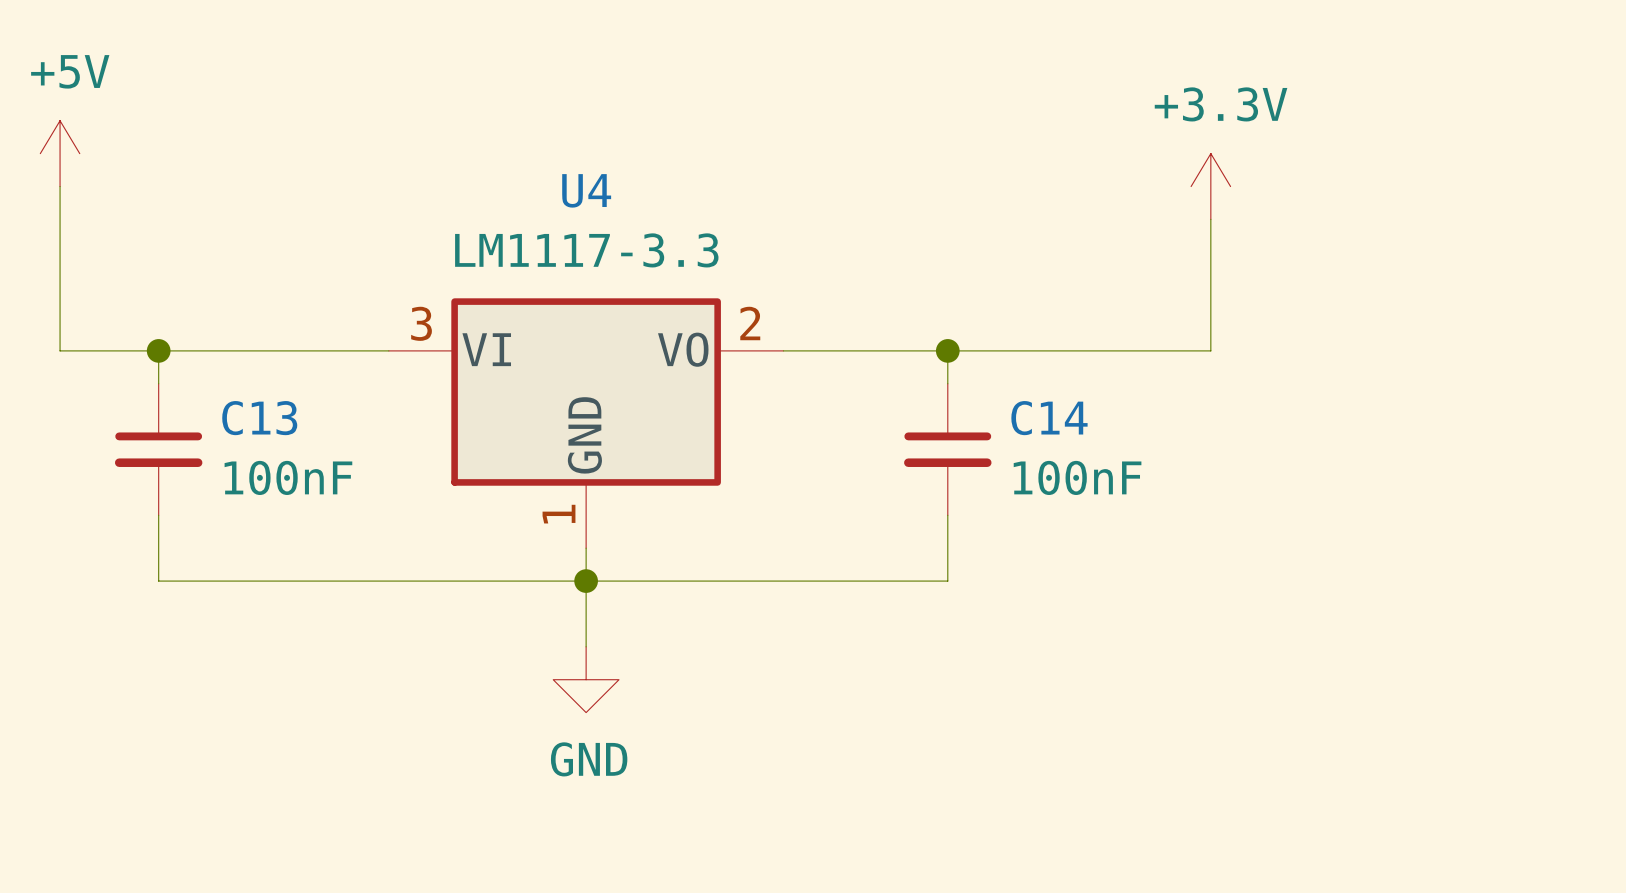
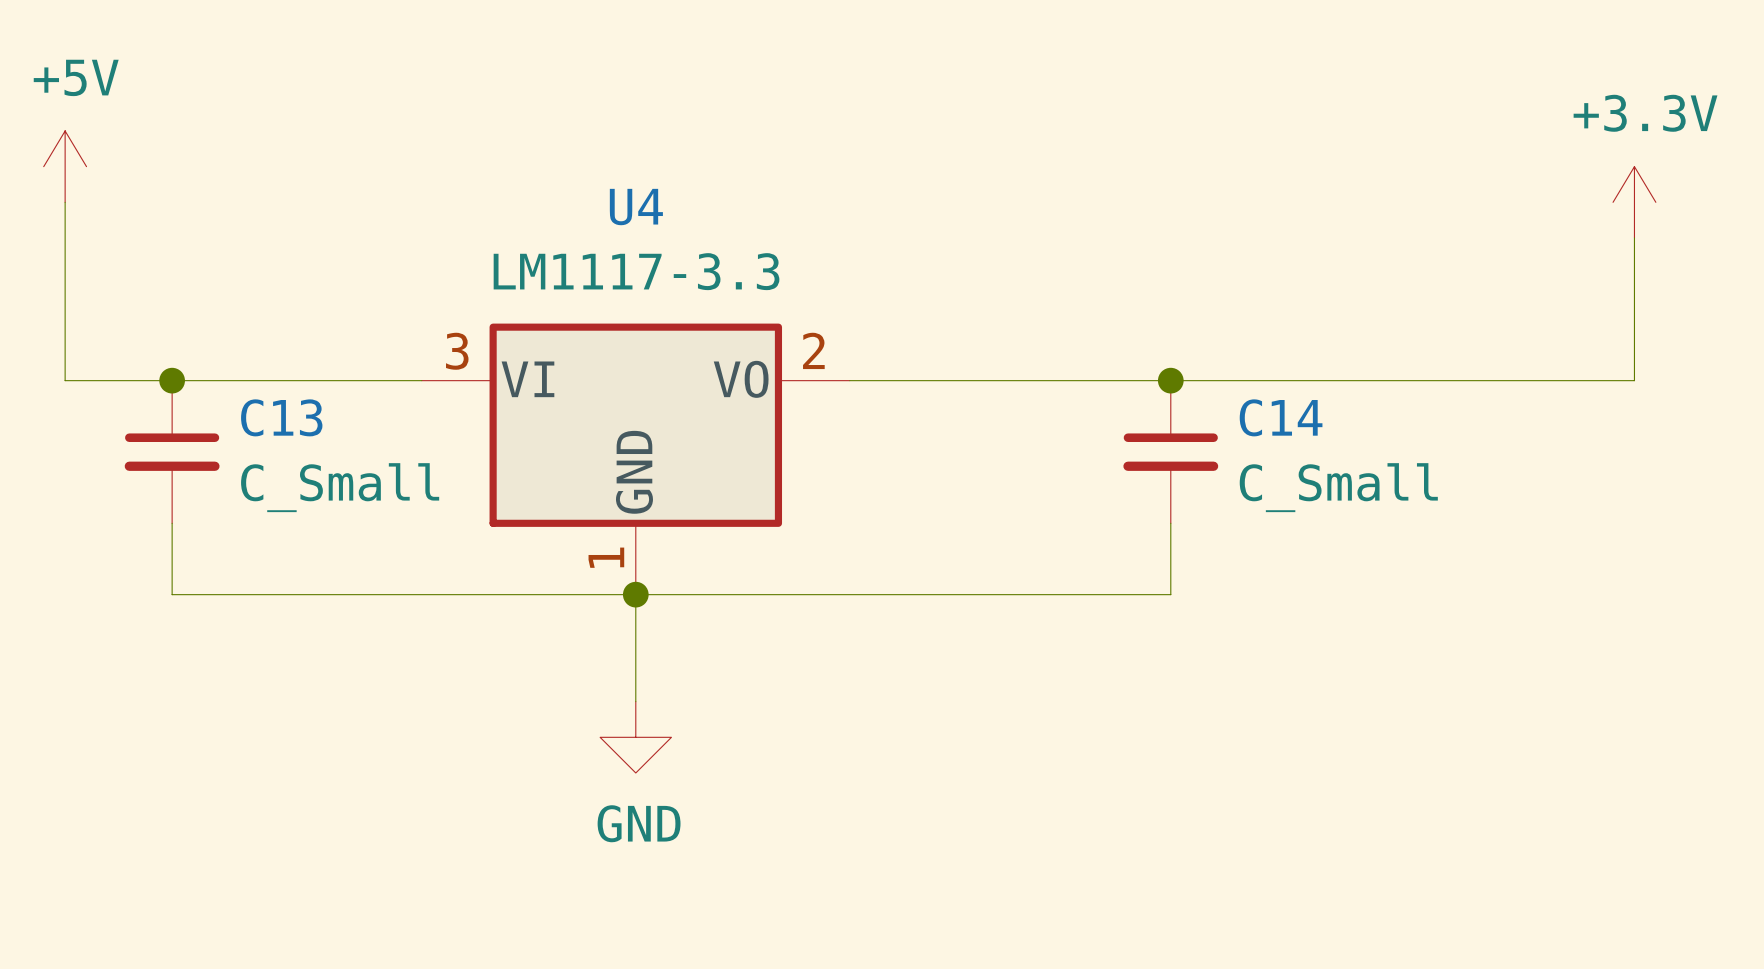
power symbol position: +3.3V (1210, 186) -> +3.3V (1634, 202)
wire: (1210, 219) (1210, 350) -> (1634, 237) (1634, 380) (1313, 380)
wire: (947, 350) (947, 383) -> none
junction position: (947, 350) -> (1170, 380)
C13 position: (158, 449) -> (172, 451)
C14 position: (947, 449) -> (1170, 451)
C13 value: 100nF (288, 477) -> C_Small (340, 487)
C14 value: 100nF (1077, 477) -> C_Small (1338, 487)
wire: (947, 515) (947, 581) (158, 581) (158, 548) -> (1170, 523) (1170, 594) (172, 594)
junction position: (586, 581) -> (635, 594)

